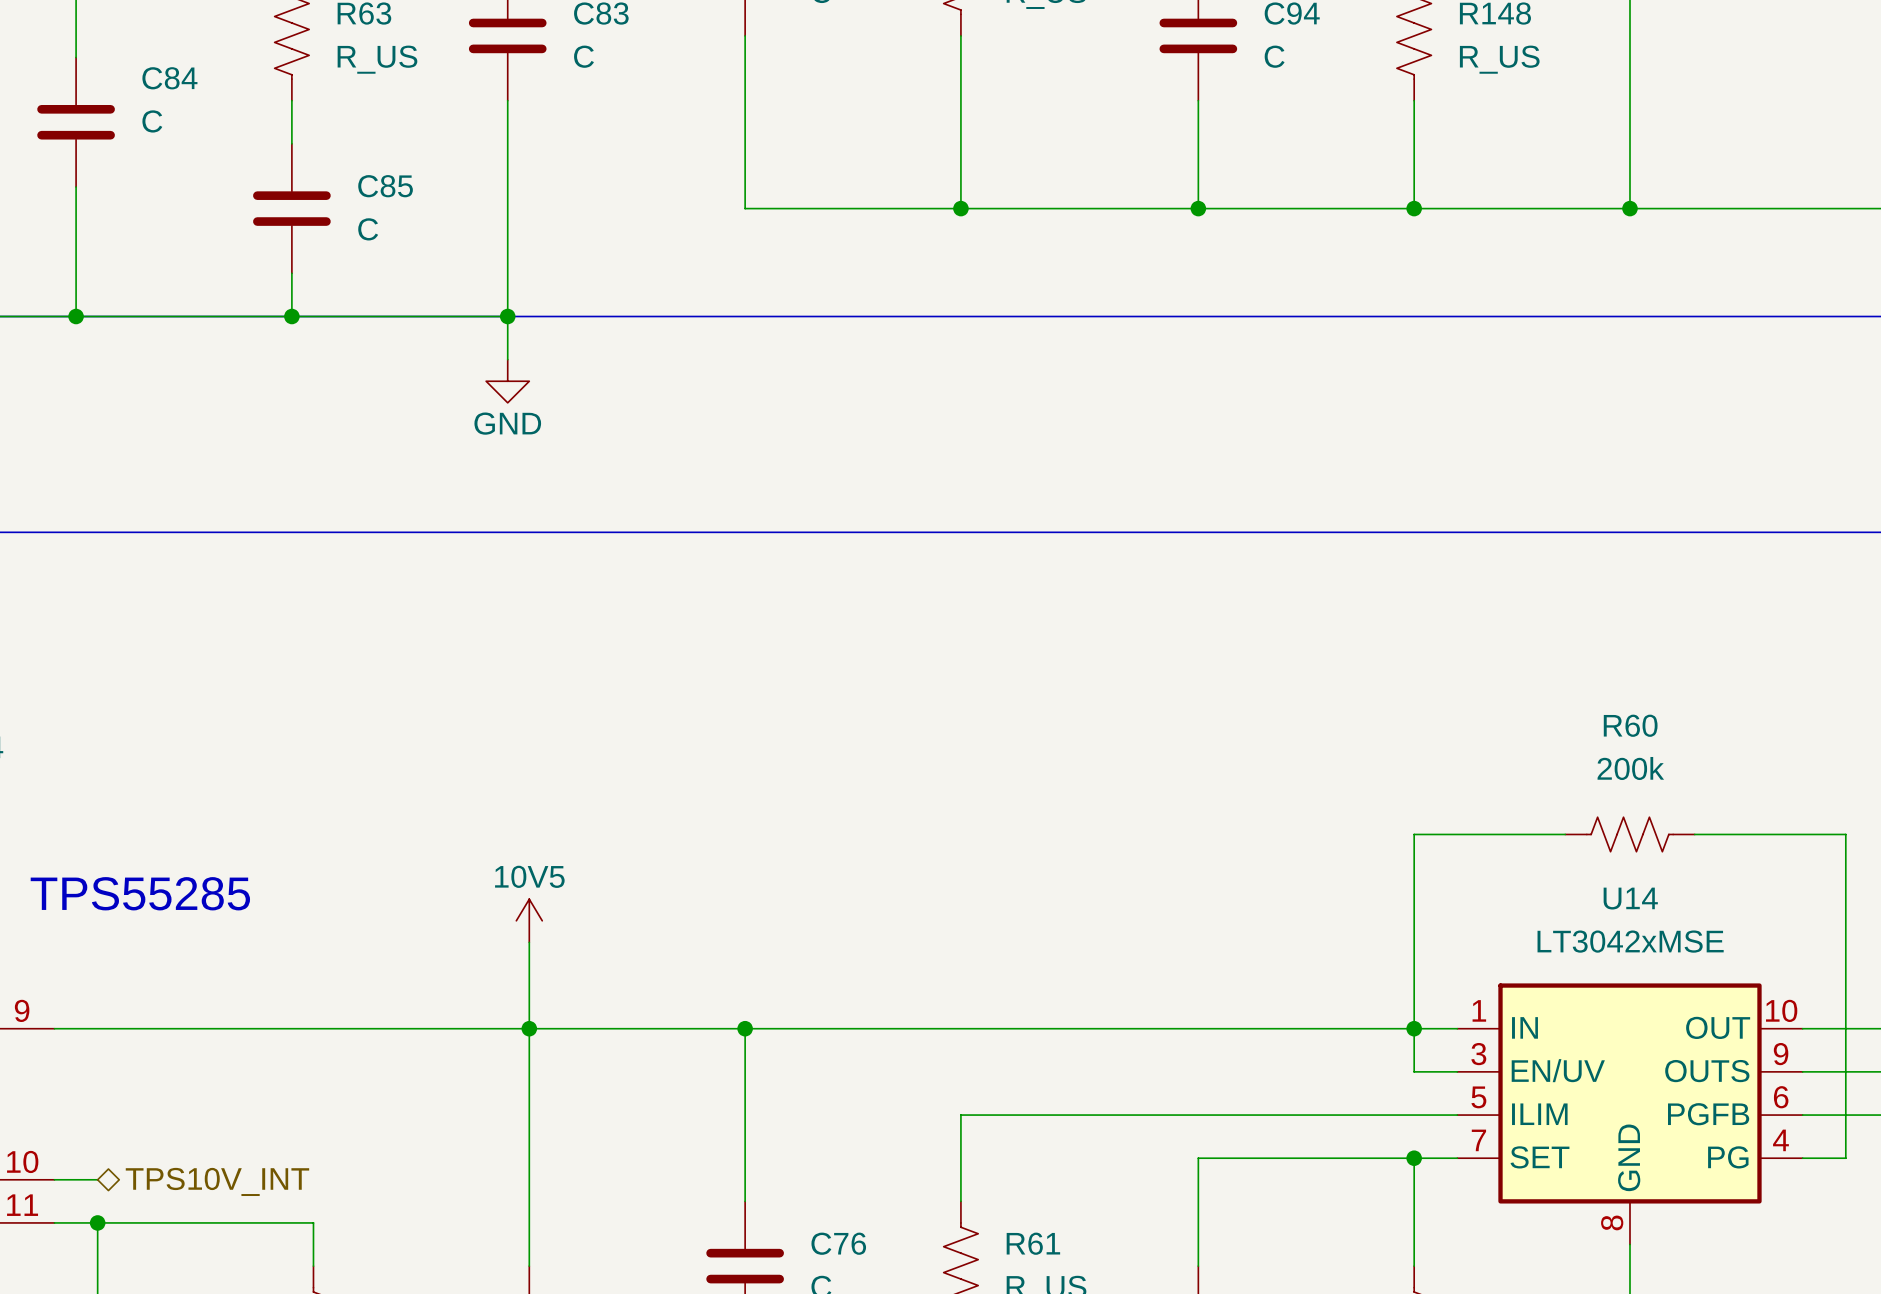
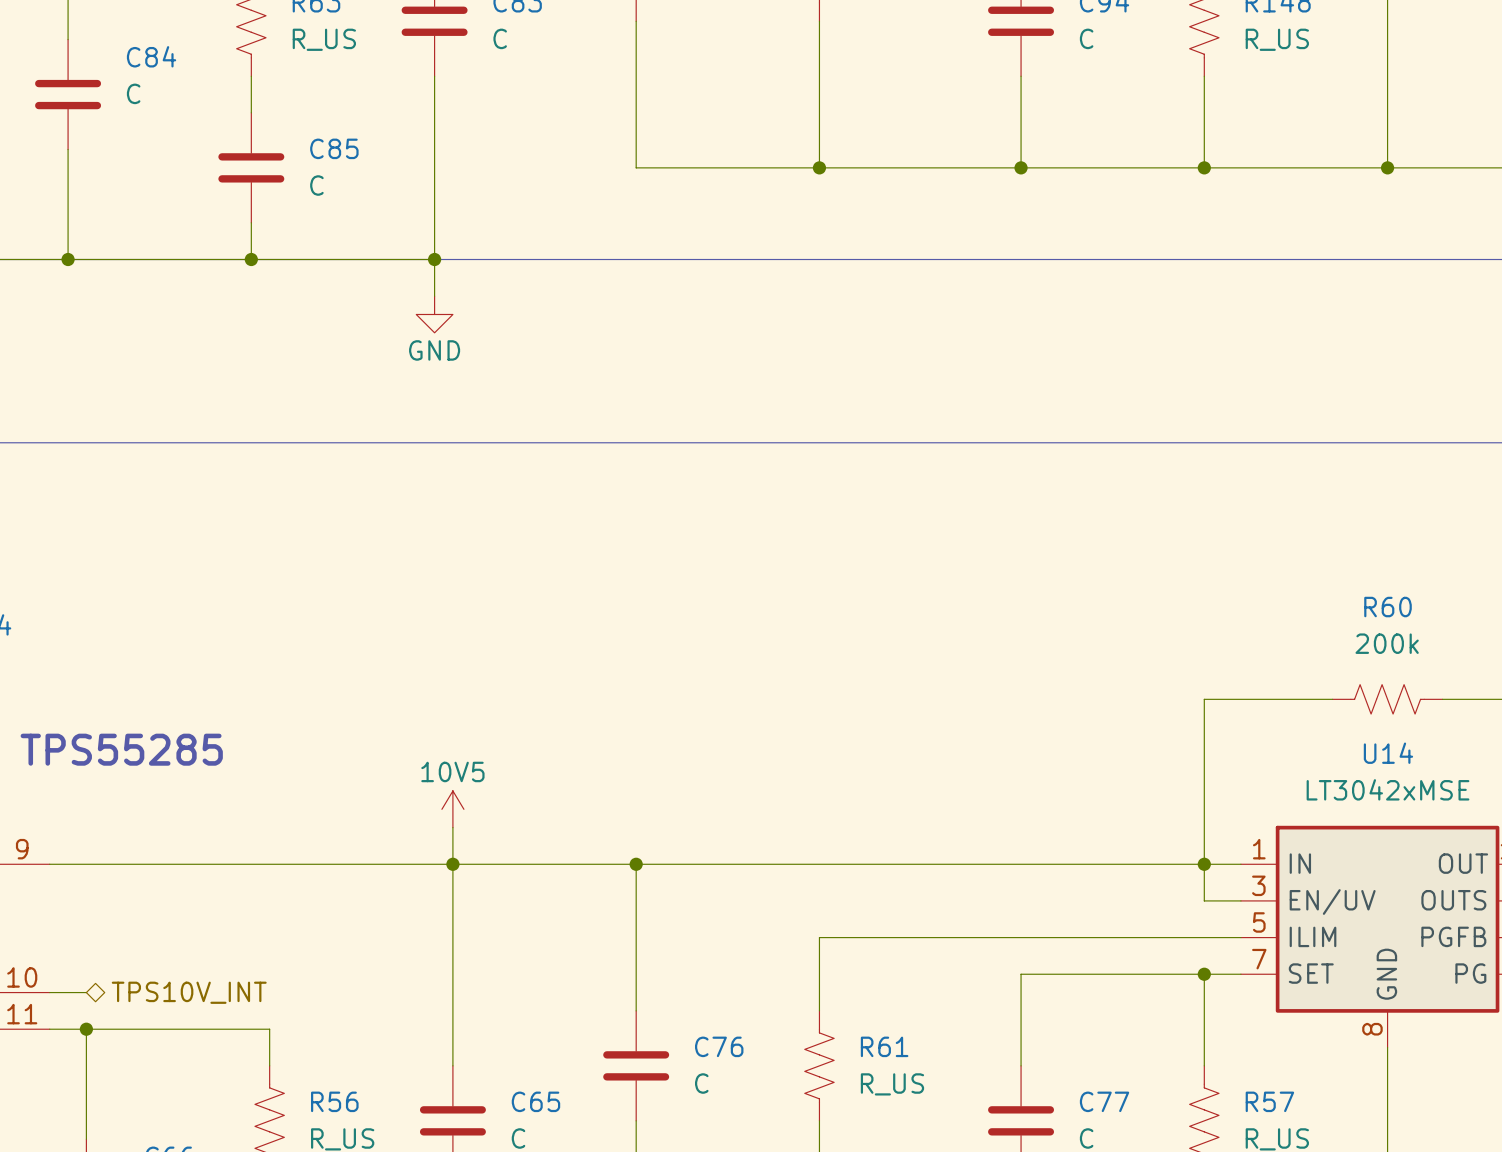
power symbol position: 10V5 (529, 920) -> 10V5 (452, 809)

